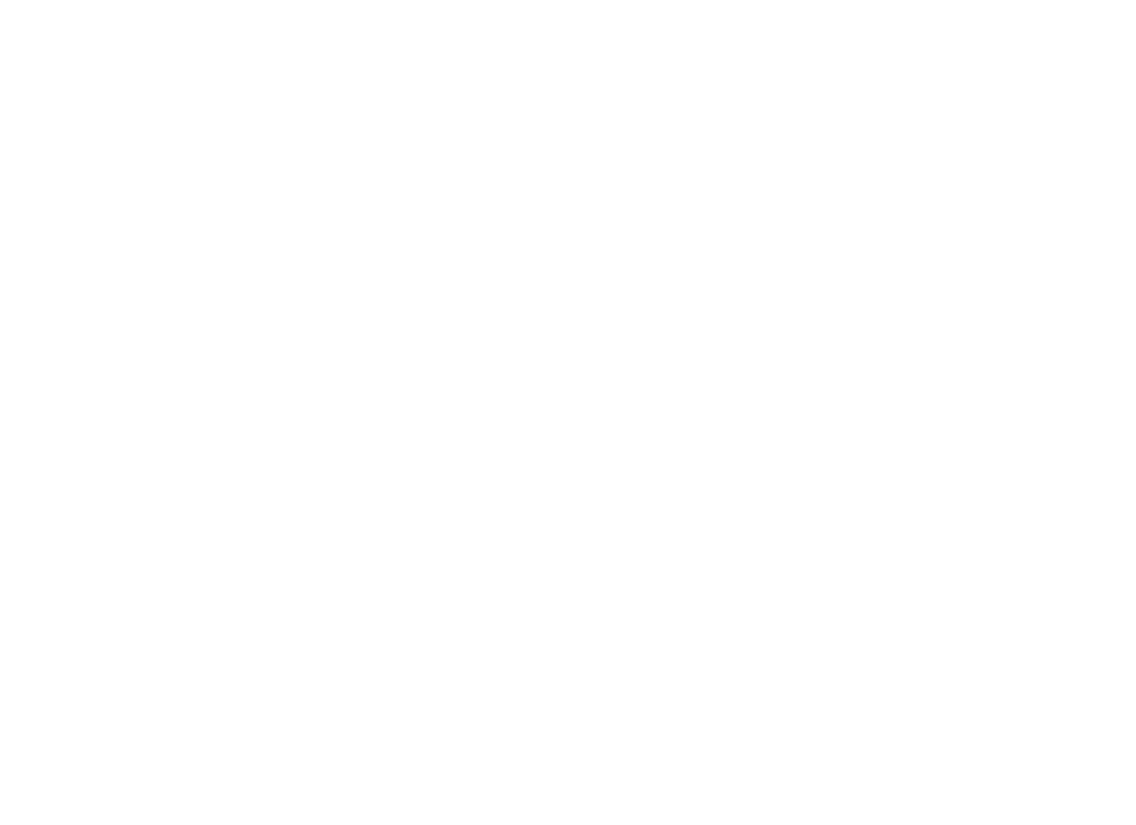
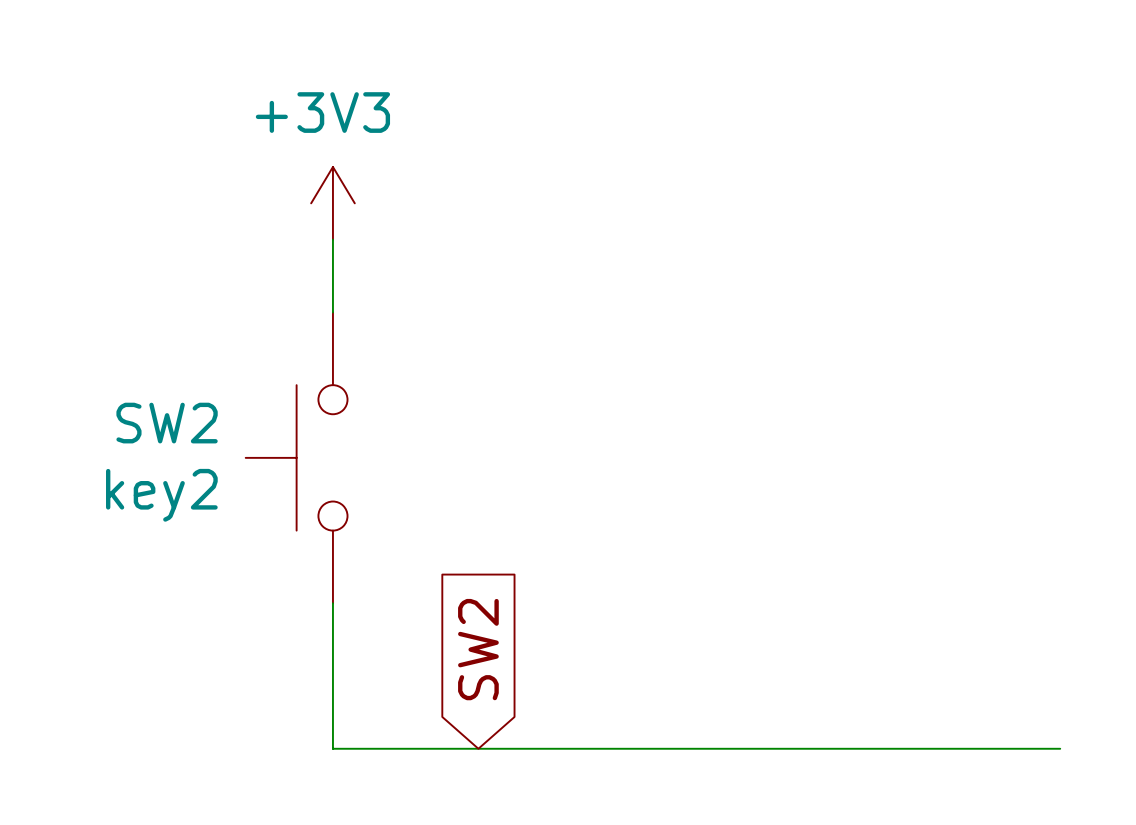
power symbol: none -> +3V3 (332, 203)
wire: none -> (332, 239) (332, 312)
SW2: none -> key2 (296, 457)
wire: none -> (332, 603) (332, 748) (1060, 748)
global label: none -> SW2 (478, 649)

